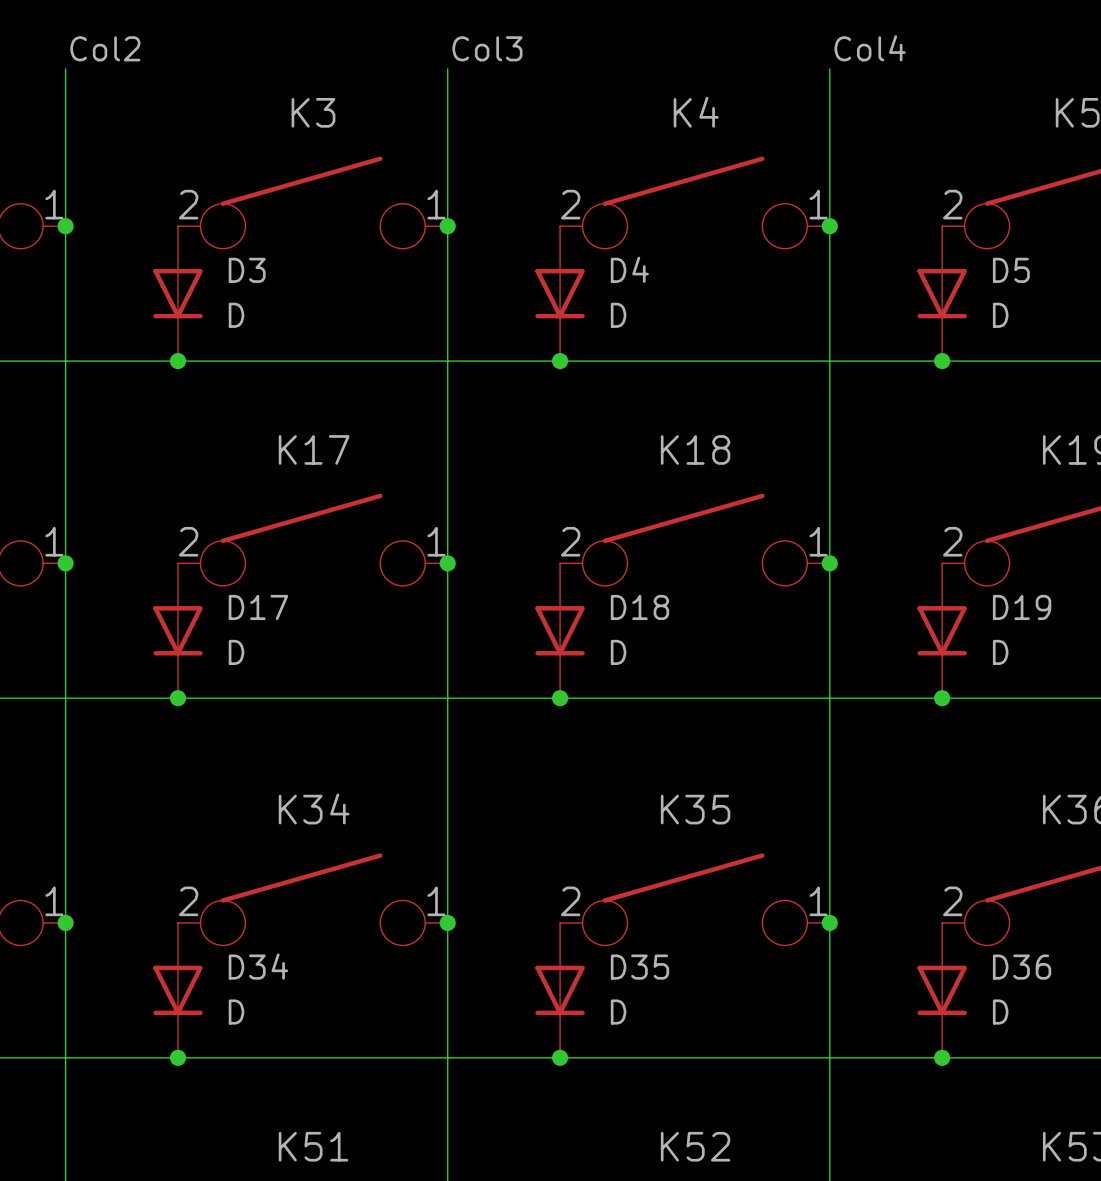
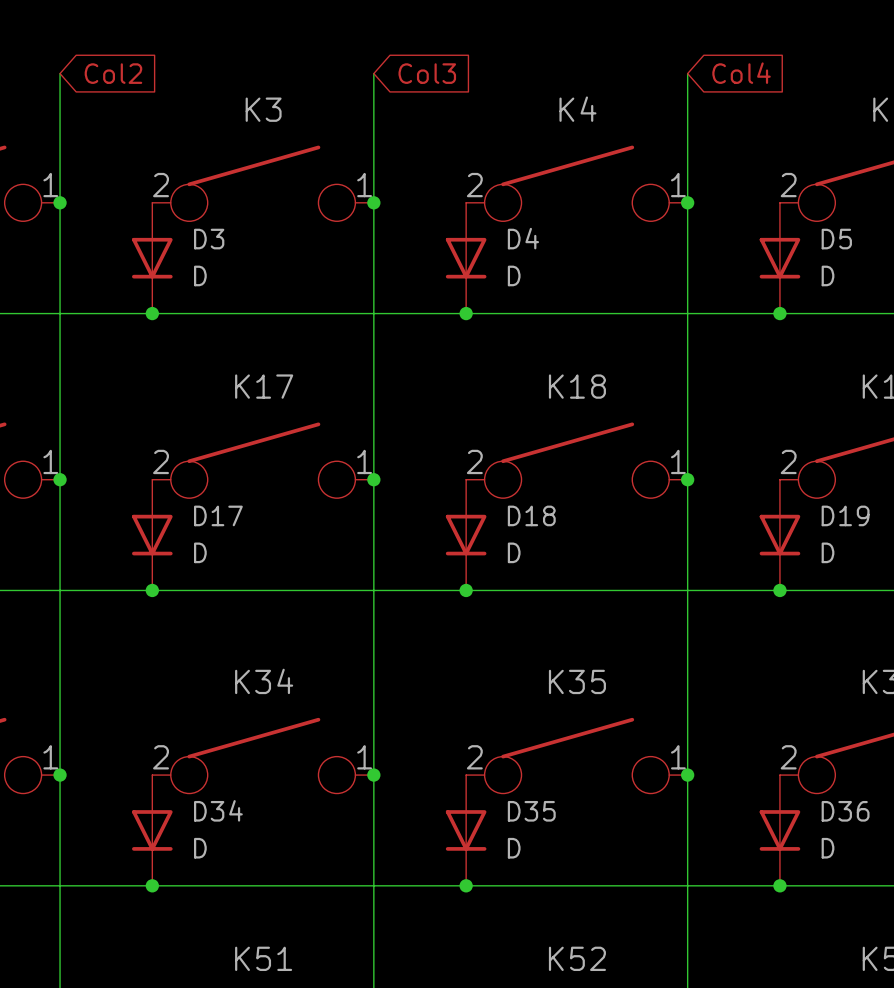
label: Col2 (105, 48) -> none
label: Col3 (487, 48) -> none
label: Col4 (870, 48) -> none
global label: none -> Col2 (113, 73)
global label: none -> Col3 (427, 73)
global label: none -> Col4 (741, 73)

